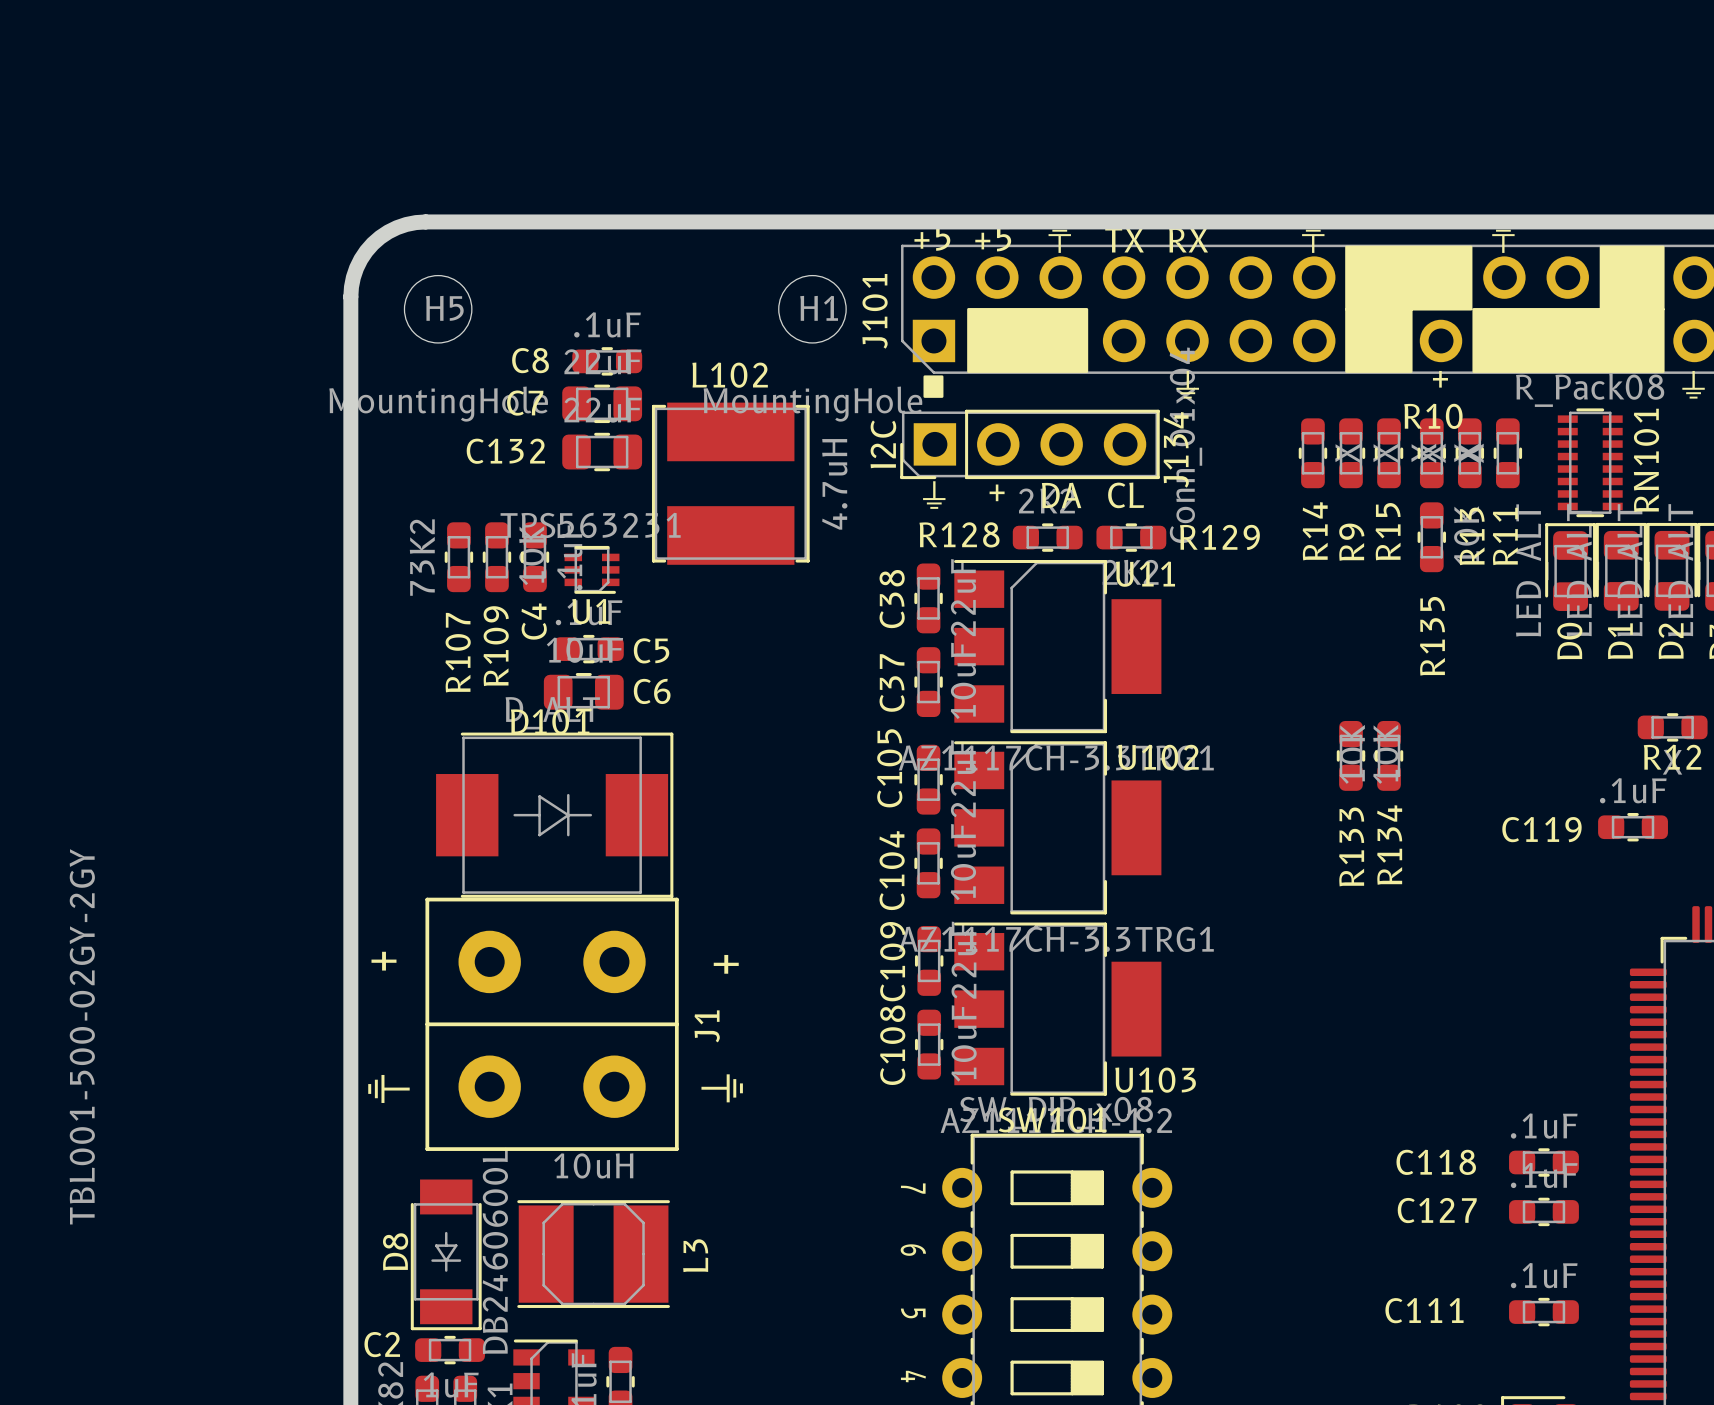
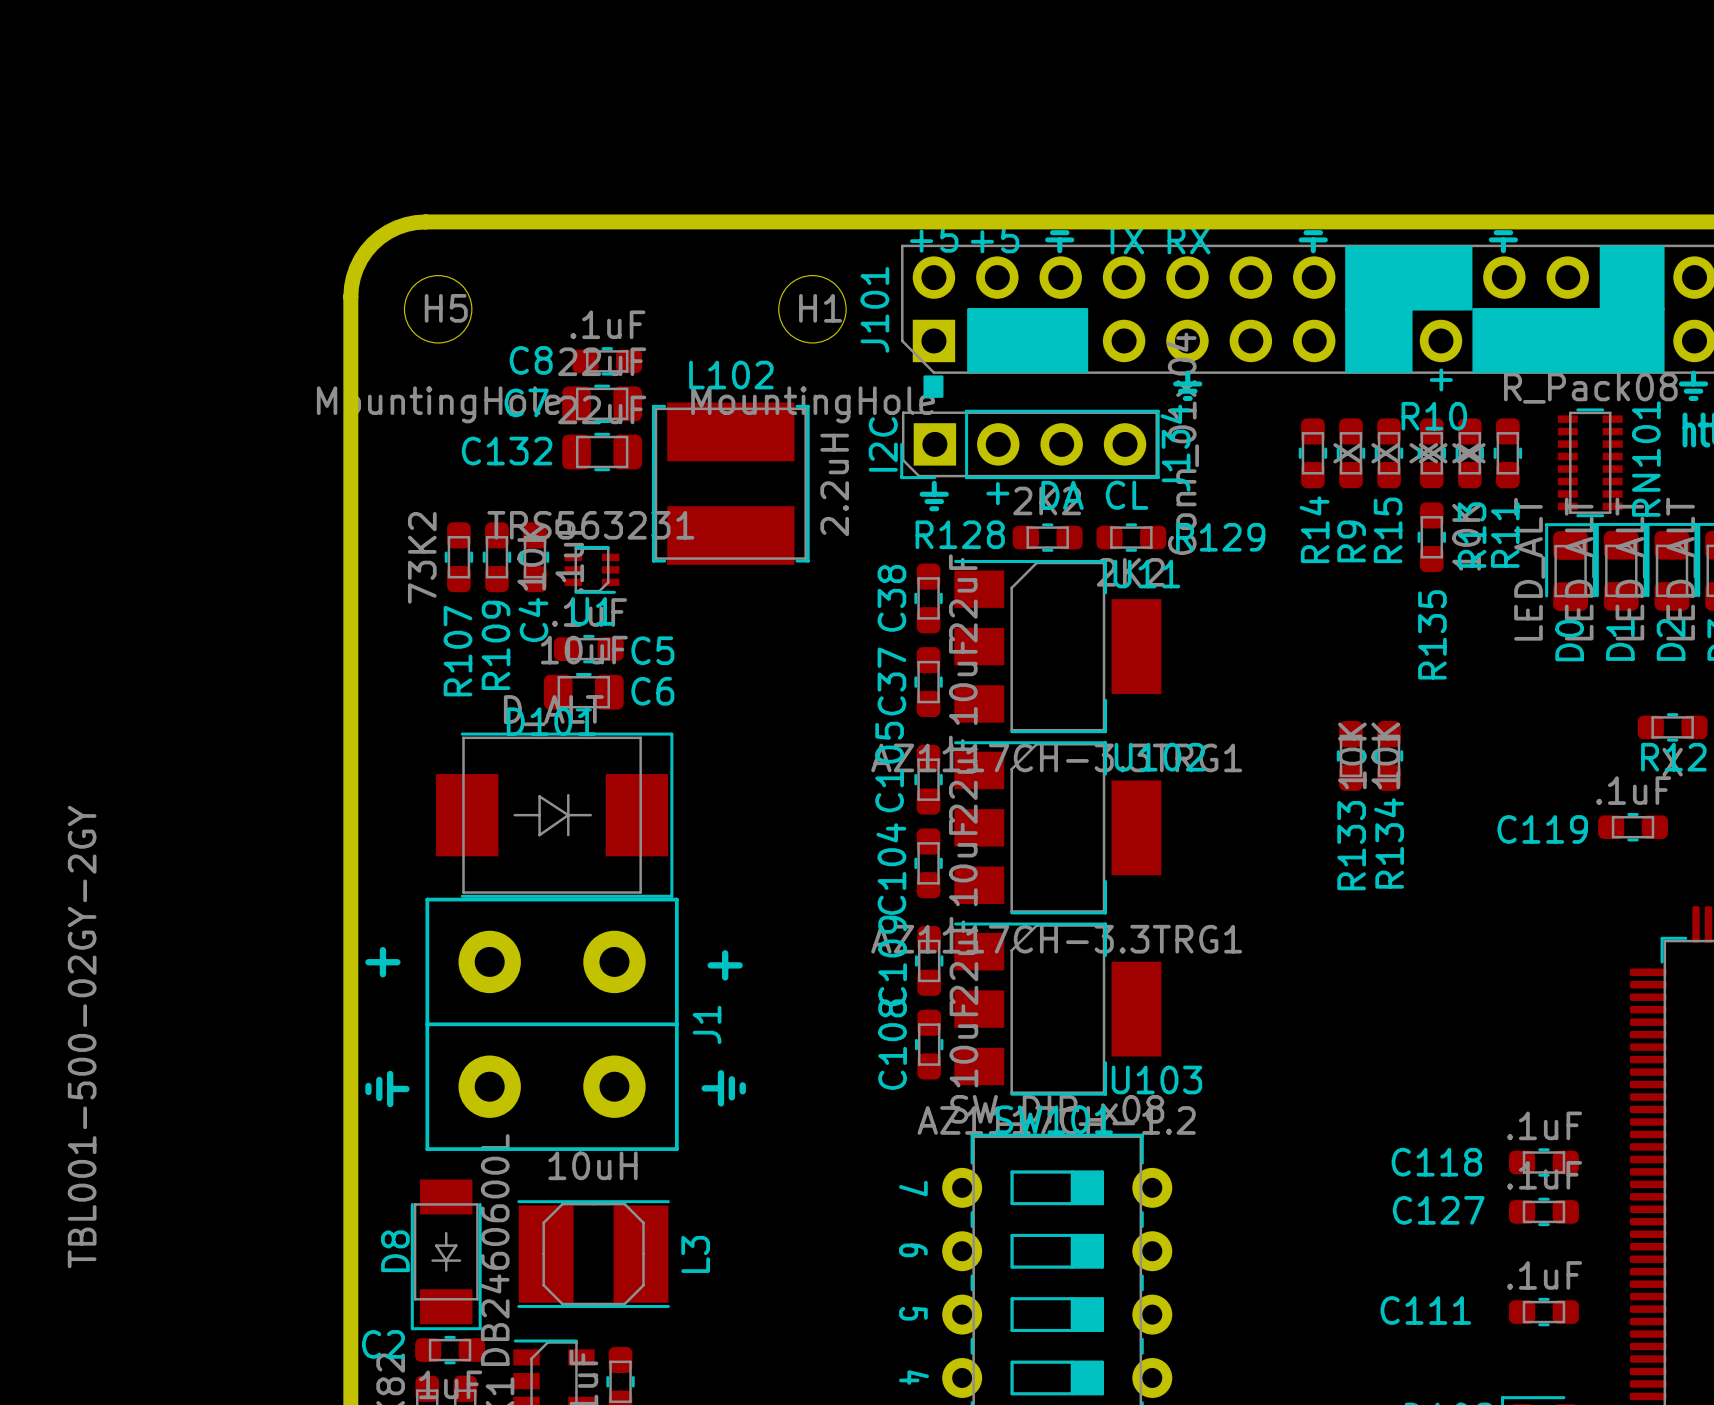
L102 value: 4.7uH (834, 484) -> 2.2uH (834, 484)

